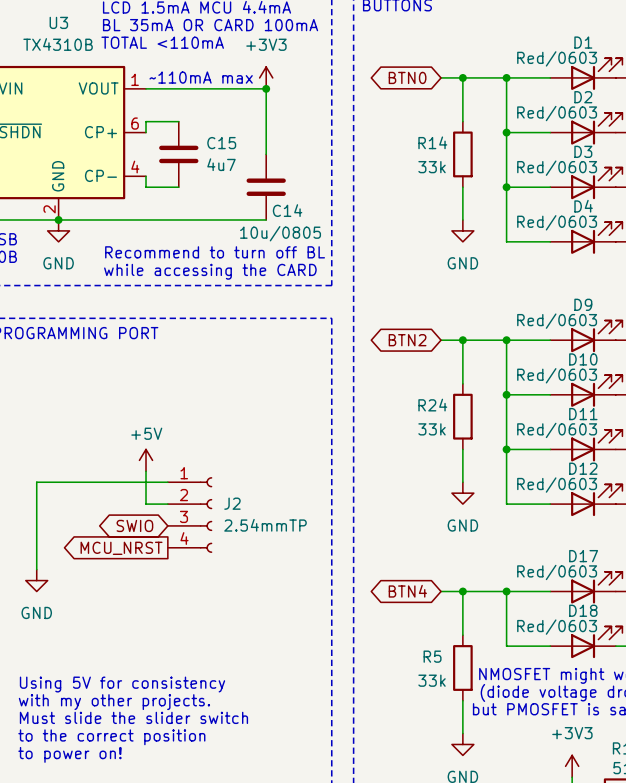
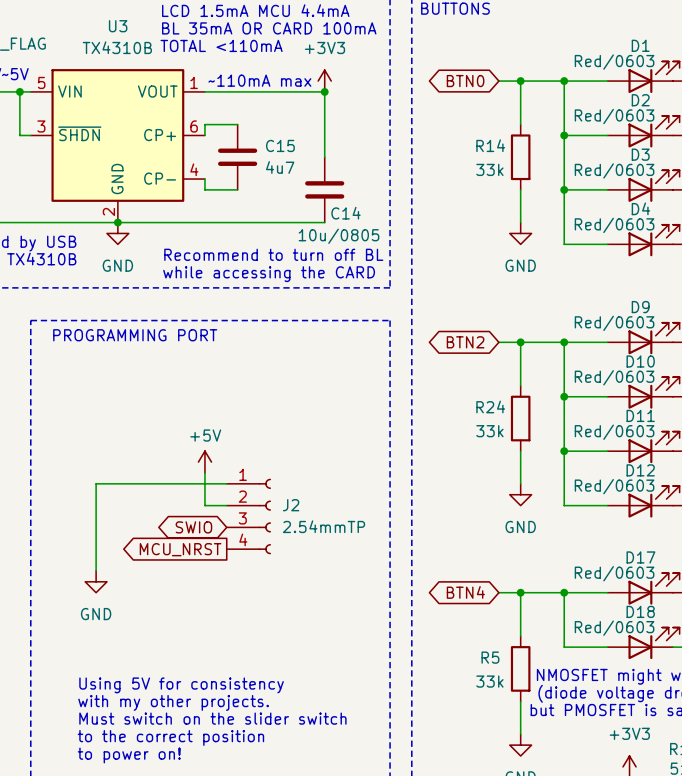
text: Must slide the slider switch (133, 717) -> Must switch on the slider switch (212, 718)

